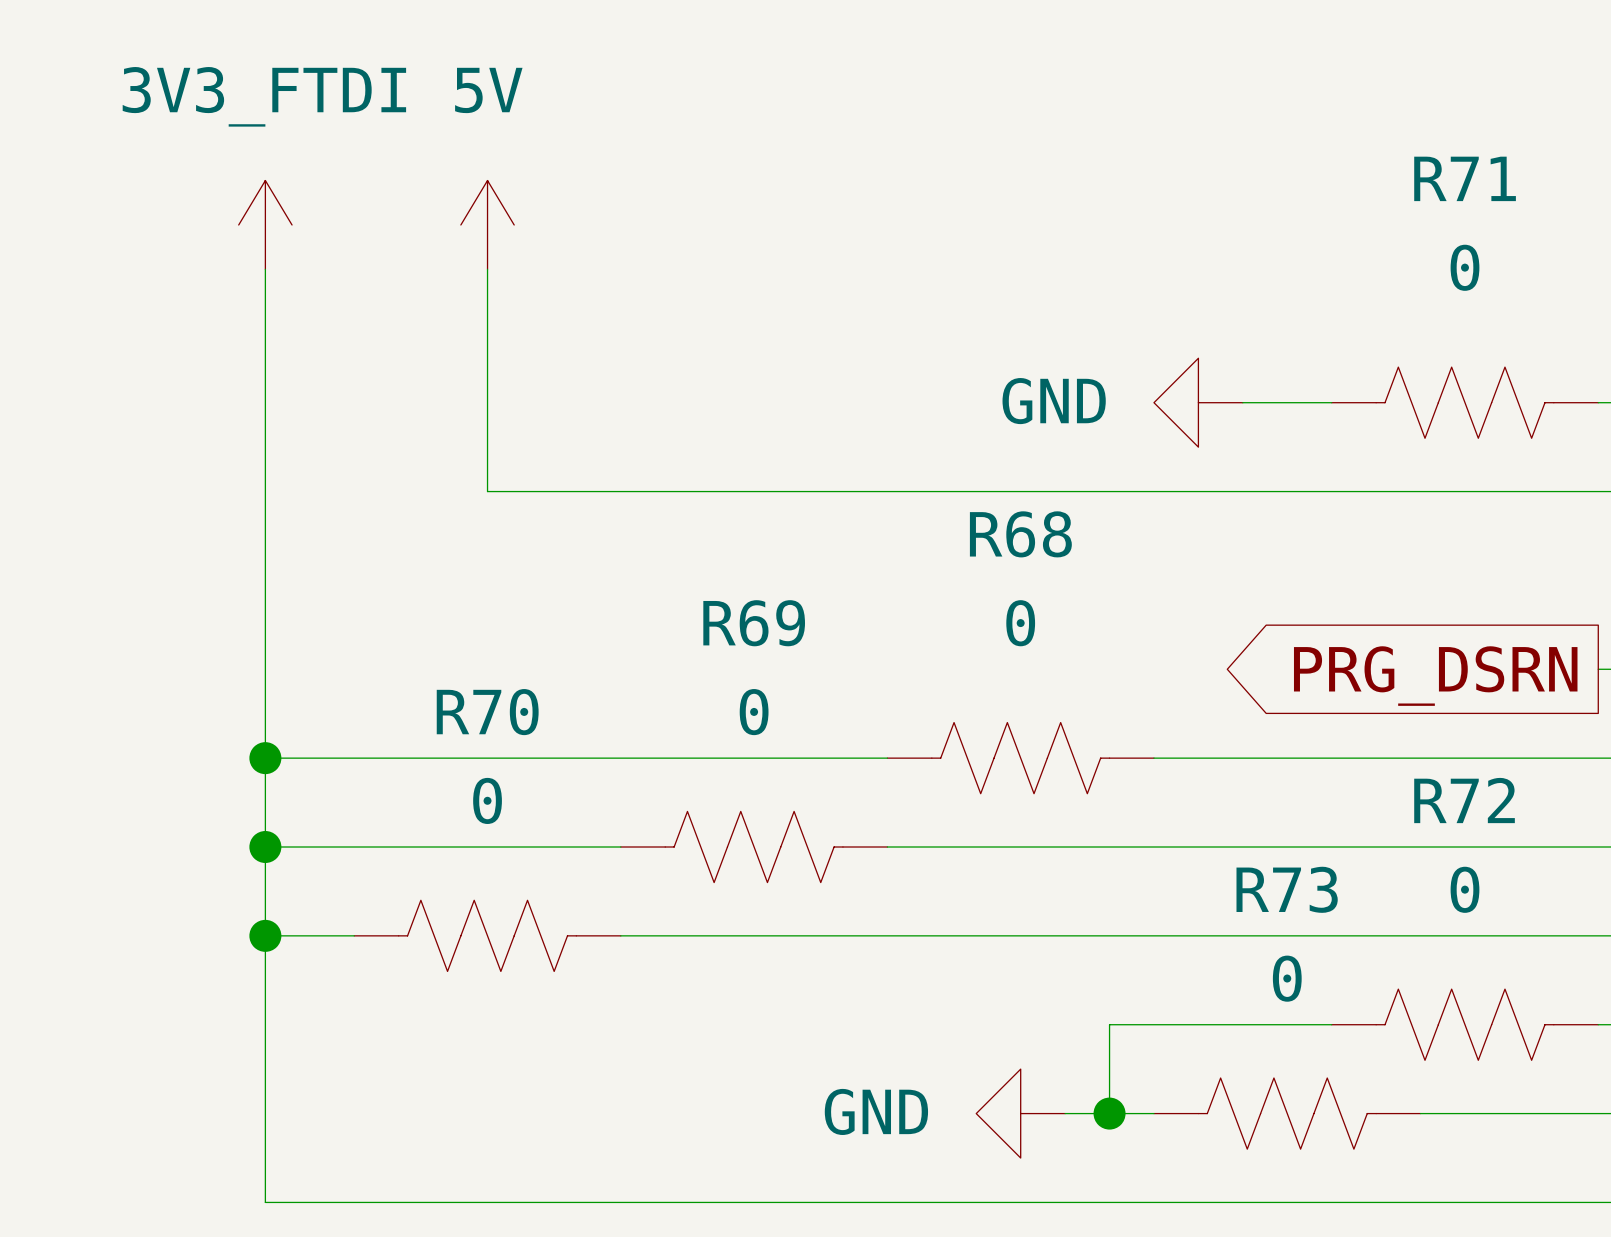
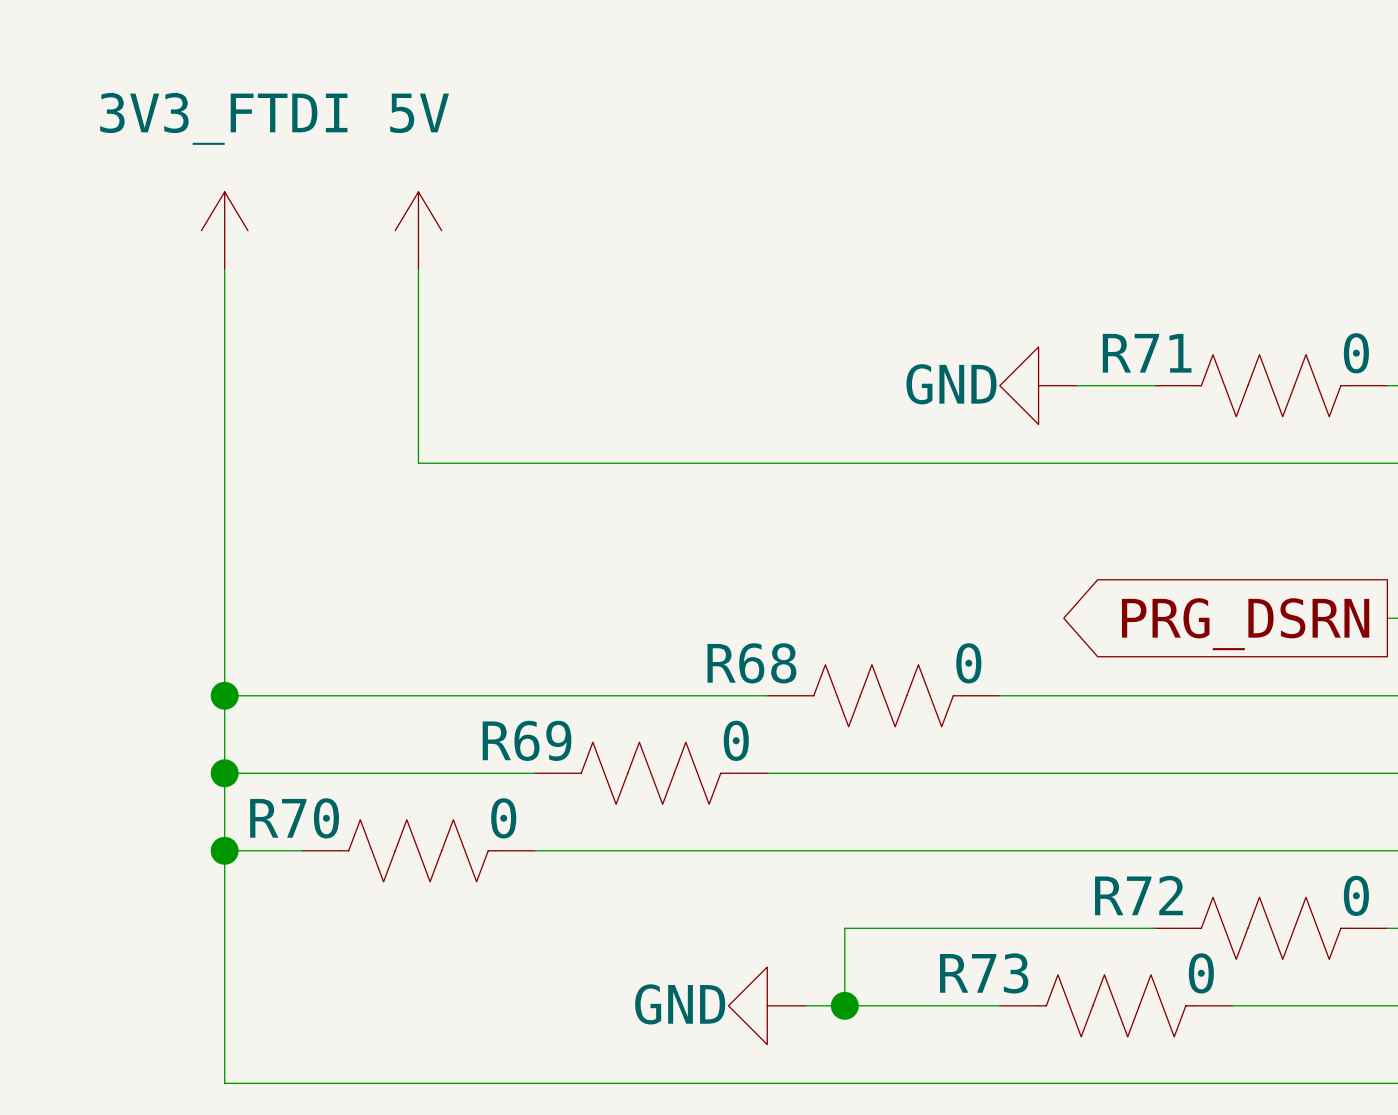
R71 name position: R71 (1465, 178) -> R71 (1147, 353)
R71 value position: 0 (1464, 267) -> 0 (1356, 353)
power symbol text position: GND (1054, 401) -> GND (951, 384)
R68 name position: R68 (1020, 534) -> R68 (751, 663)
R69 name position: R69 (754, 623) -> R69 (527, 740)
R68 value position: 0 (1020, 623) -> 0 (968, 663)
R70 name position: R70 (487, 712) -> R70 (294, 818)
R69 value position: 0 (754, 712) -> 0 (736, 740)
R70 value position: 0 (487, 800) -> 0 (503, 818)
R72 name position: R72 (1464, 800) -> R72 (1138, 895)
R73 name position: R73 (1287, 889) -> R73 (984, 973)
R72 value position: 0 (1464, 889) -> 0 (1356, 895)
R73 value position: 0 (1287, 978) -> 0 (1201, 973)
wire: (1109, 1024) (1109, 1113) -> (961, 928) (844, 928) (844, 1005)
power symbol text position: GND (876, 1111) -> GND (680, 1004)
wire: none -> (806, 1005) (922, 1005)
power symbol position: GND (1020, 1113) -> GND (767, 1005)
junction position: (1109, 1113) -> (844, 1005)

